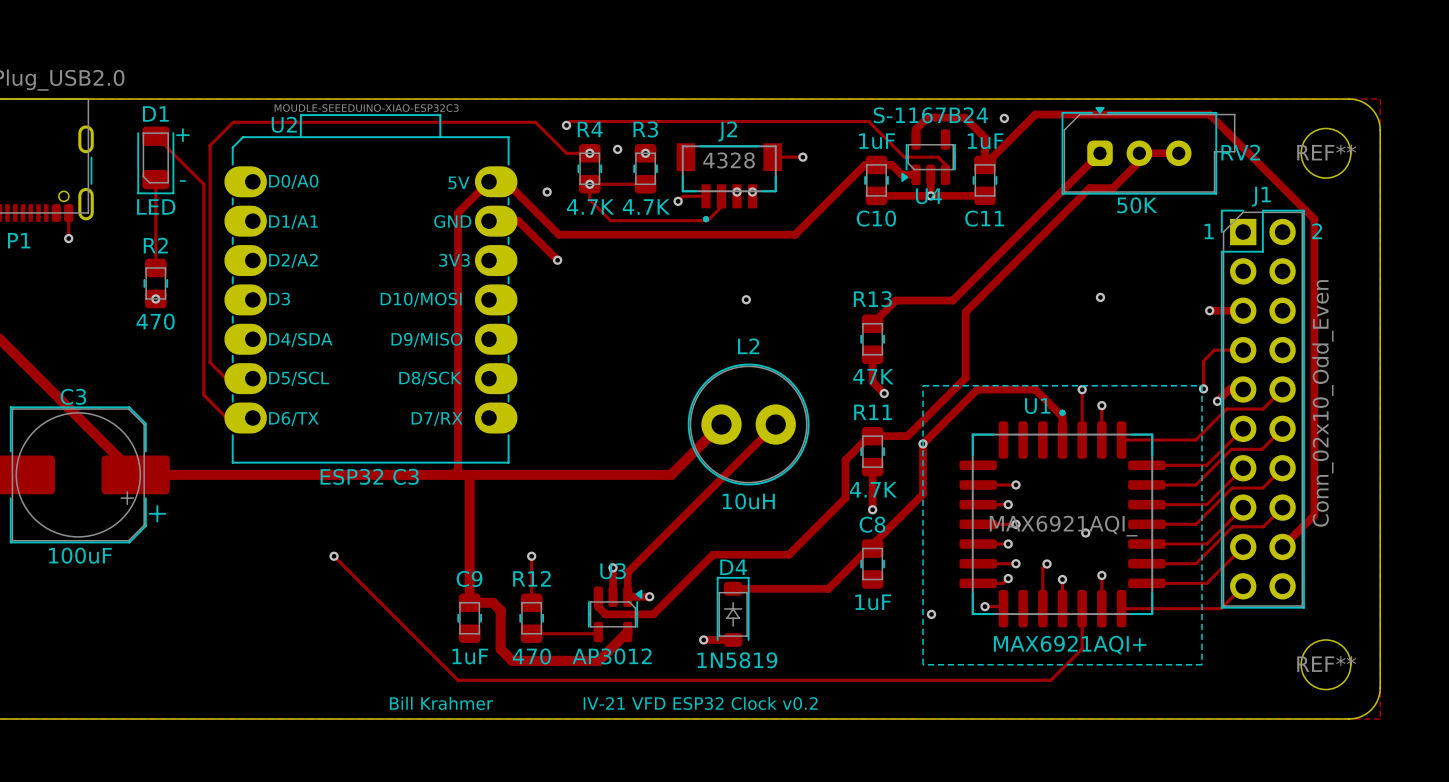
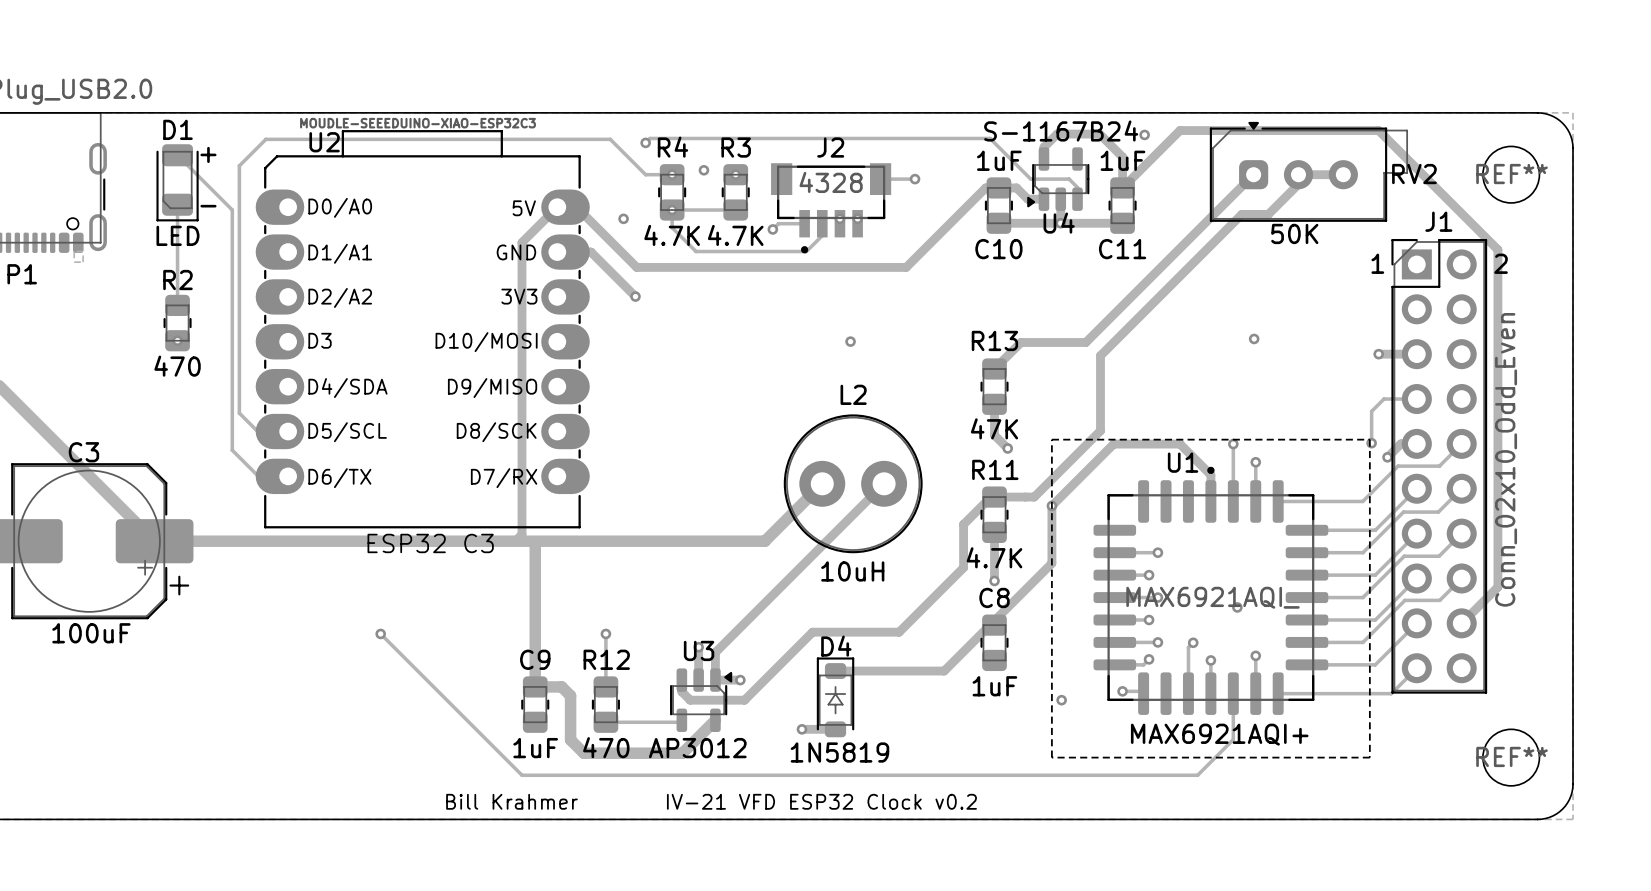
track: (68, 213) (68, 238) -> none
zone outline: none -> (74, 251) (74, 262) (83, 262) (83, 251) (74, 251)
via: (68, 238) -> none

